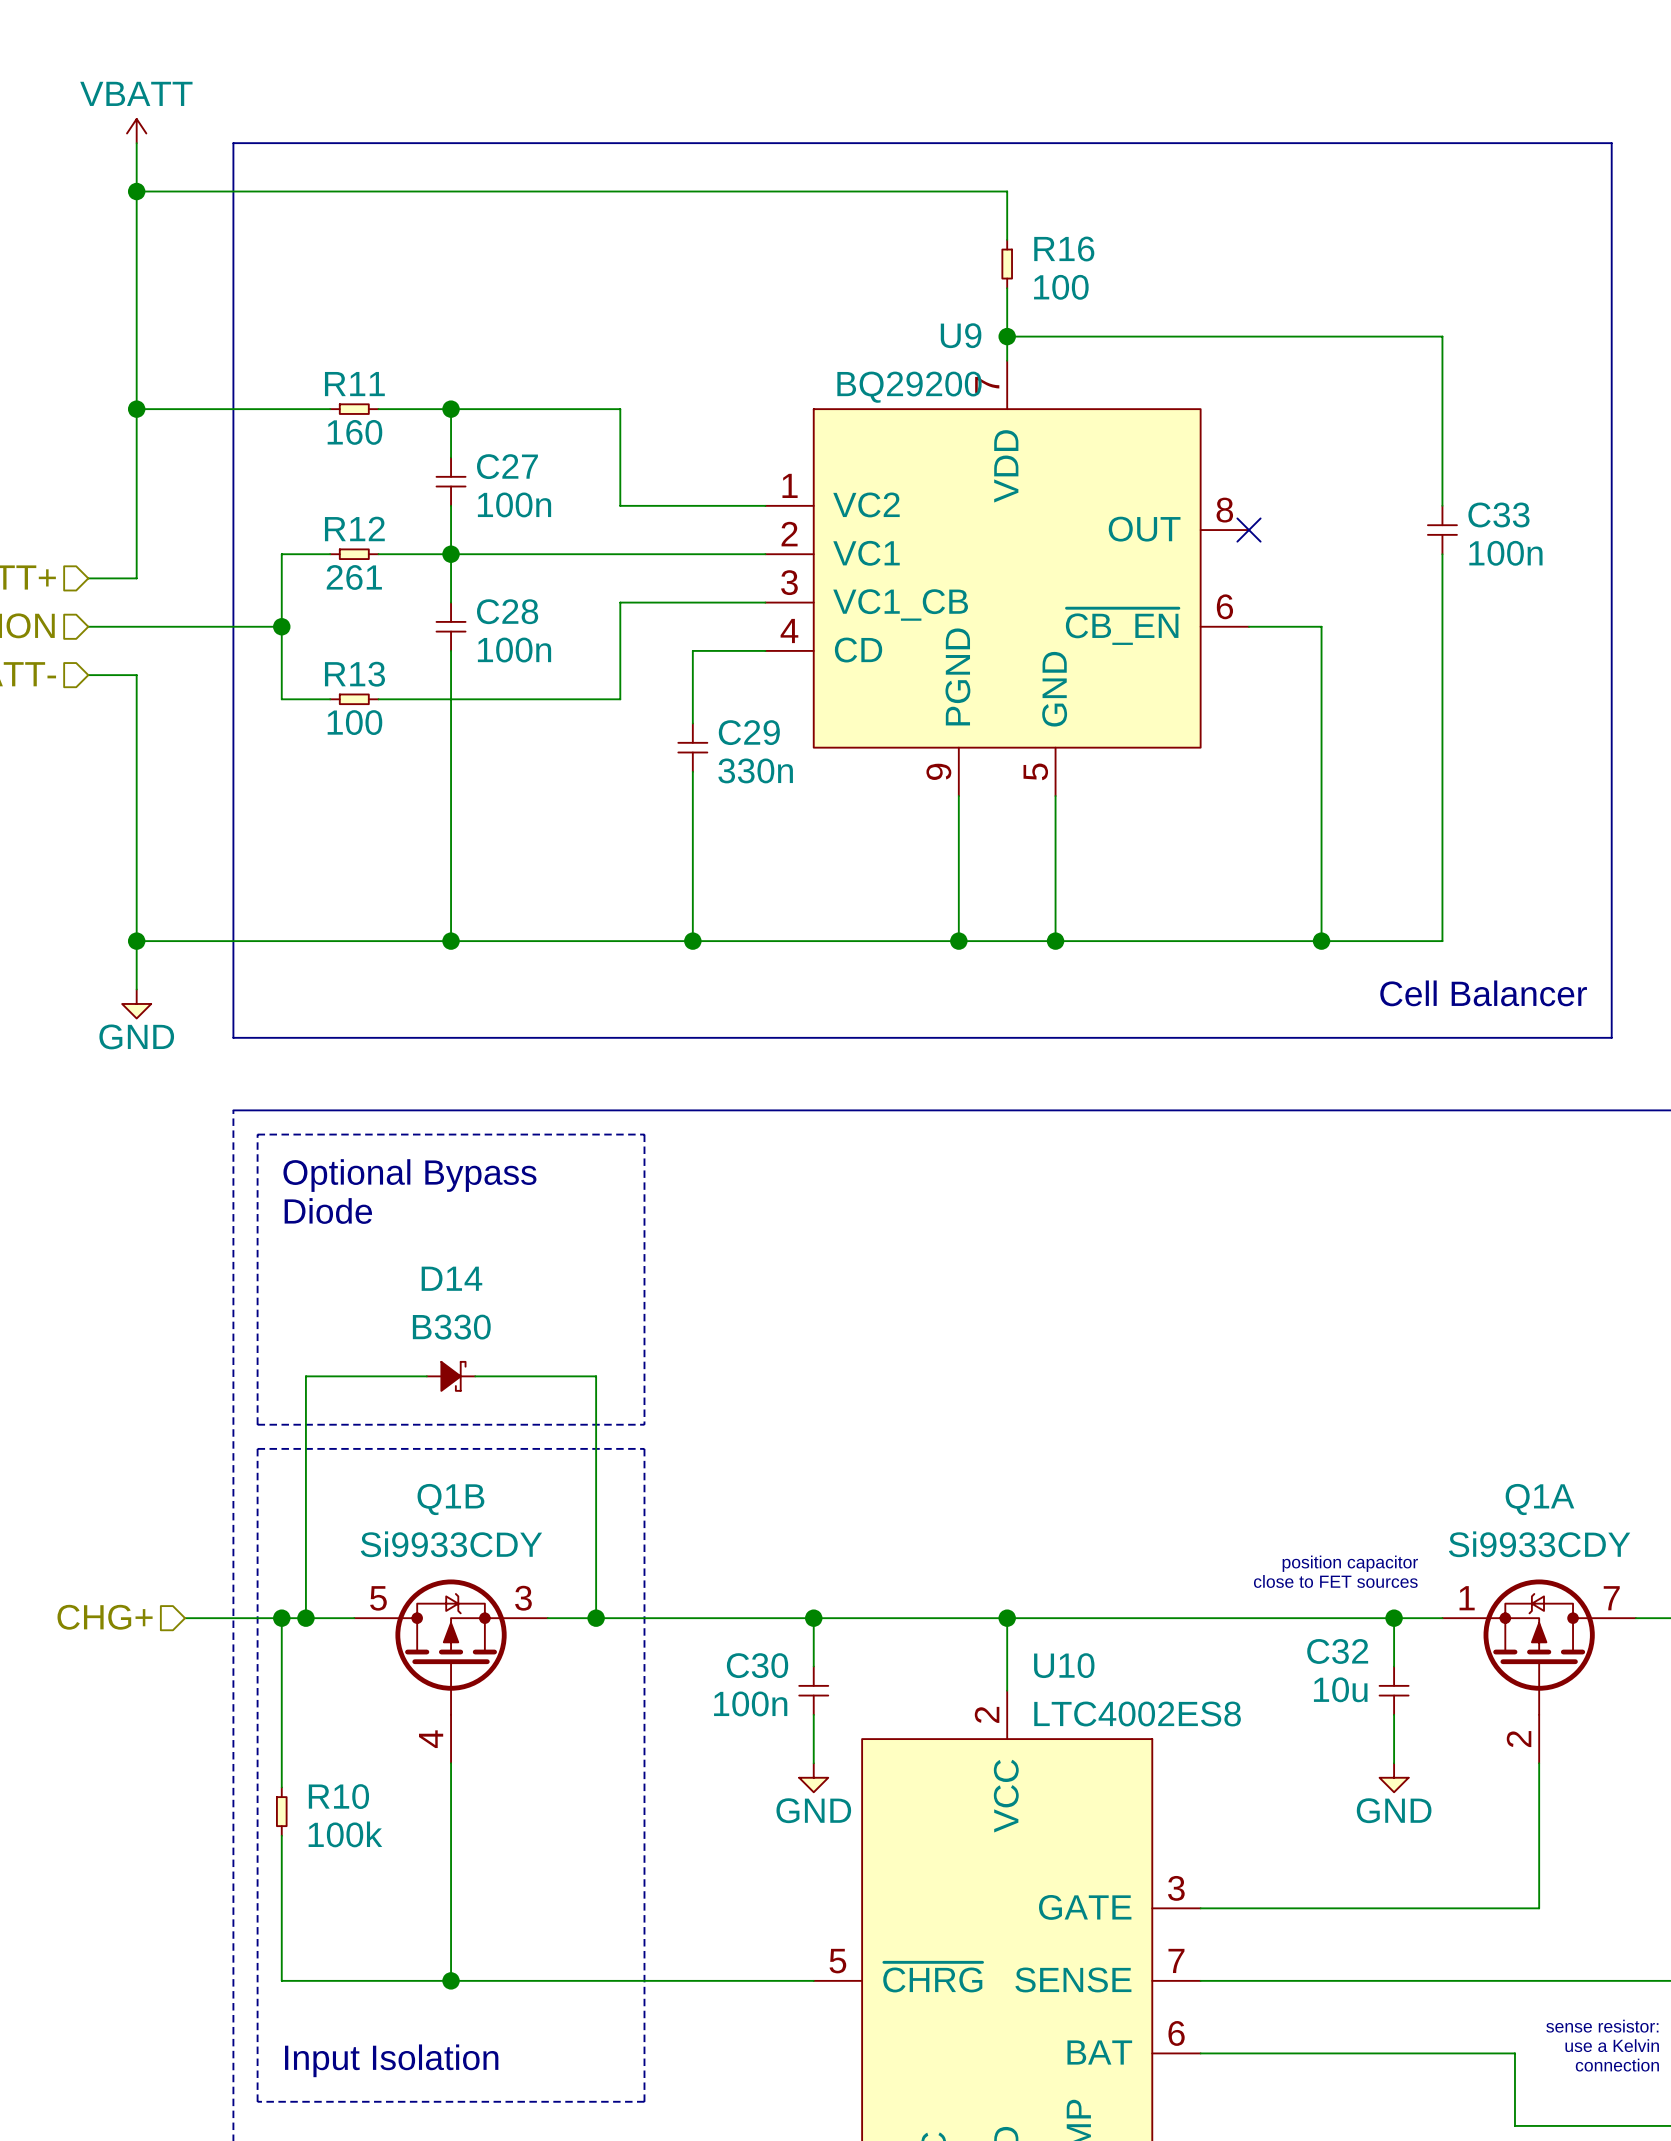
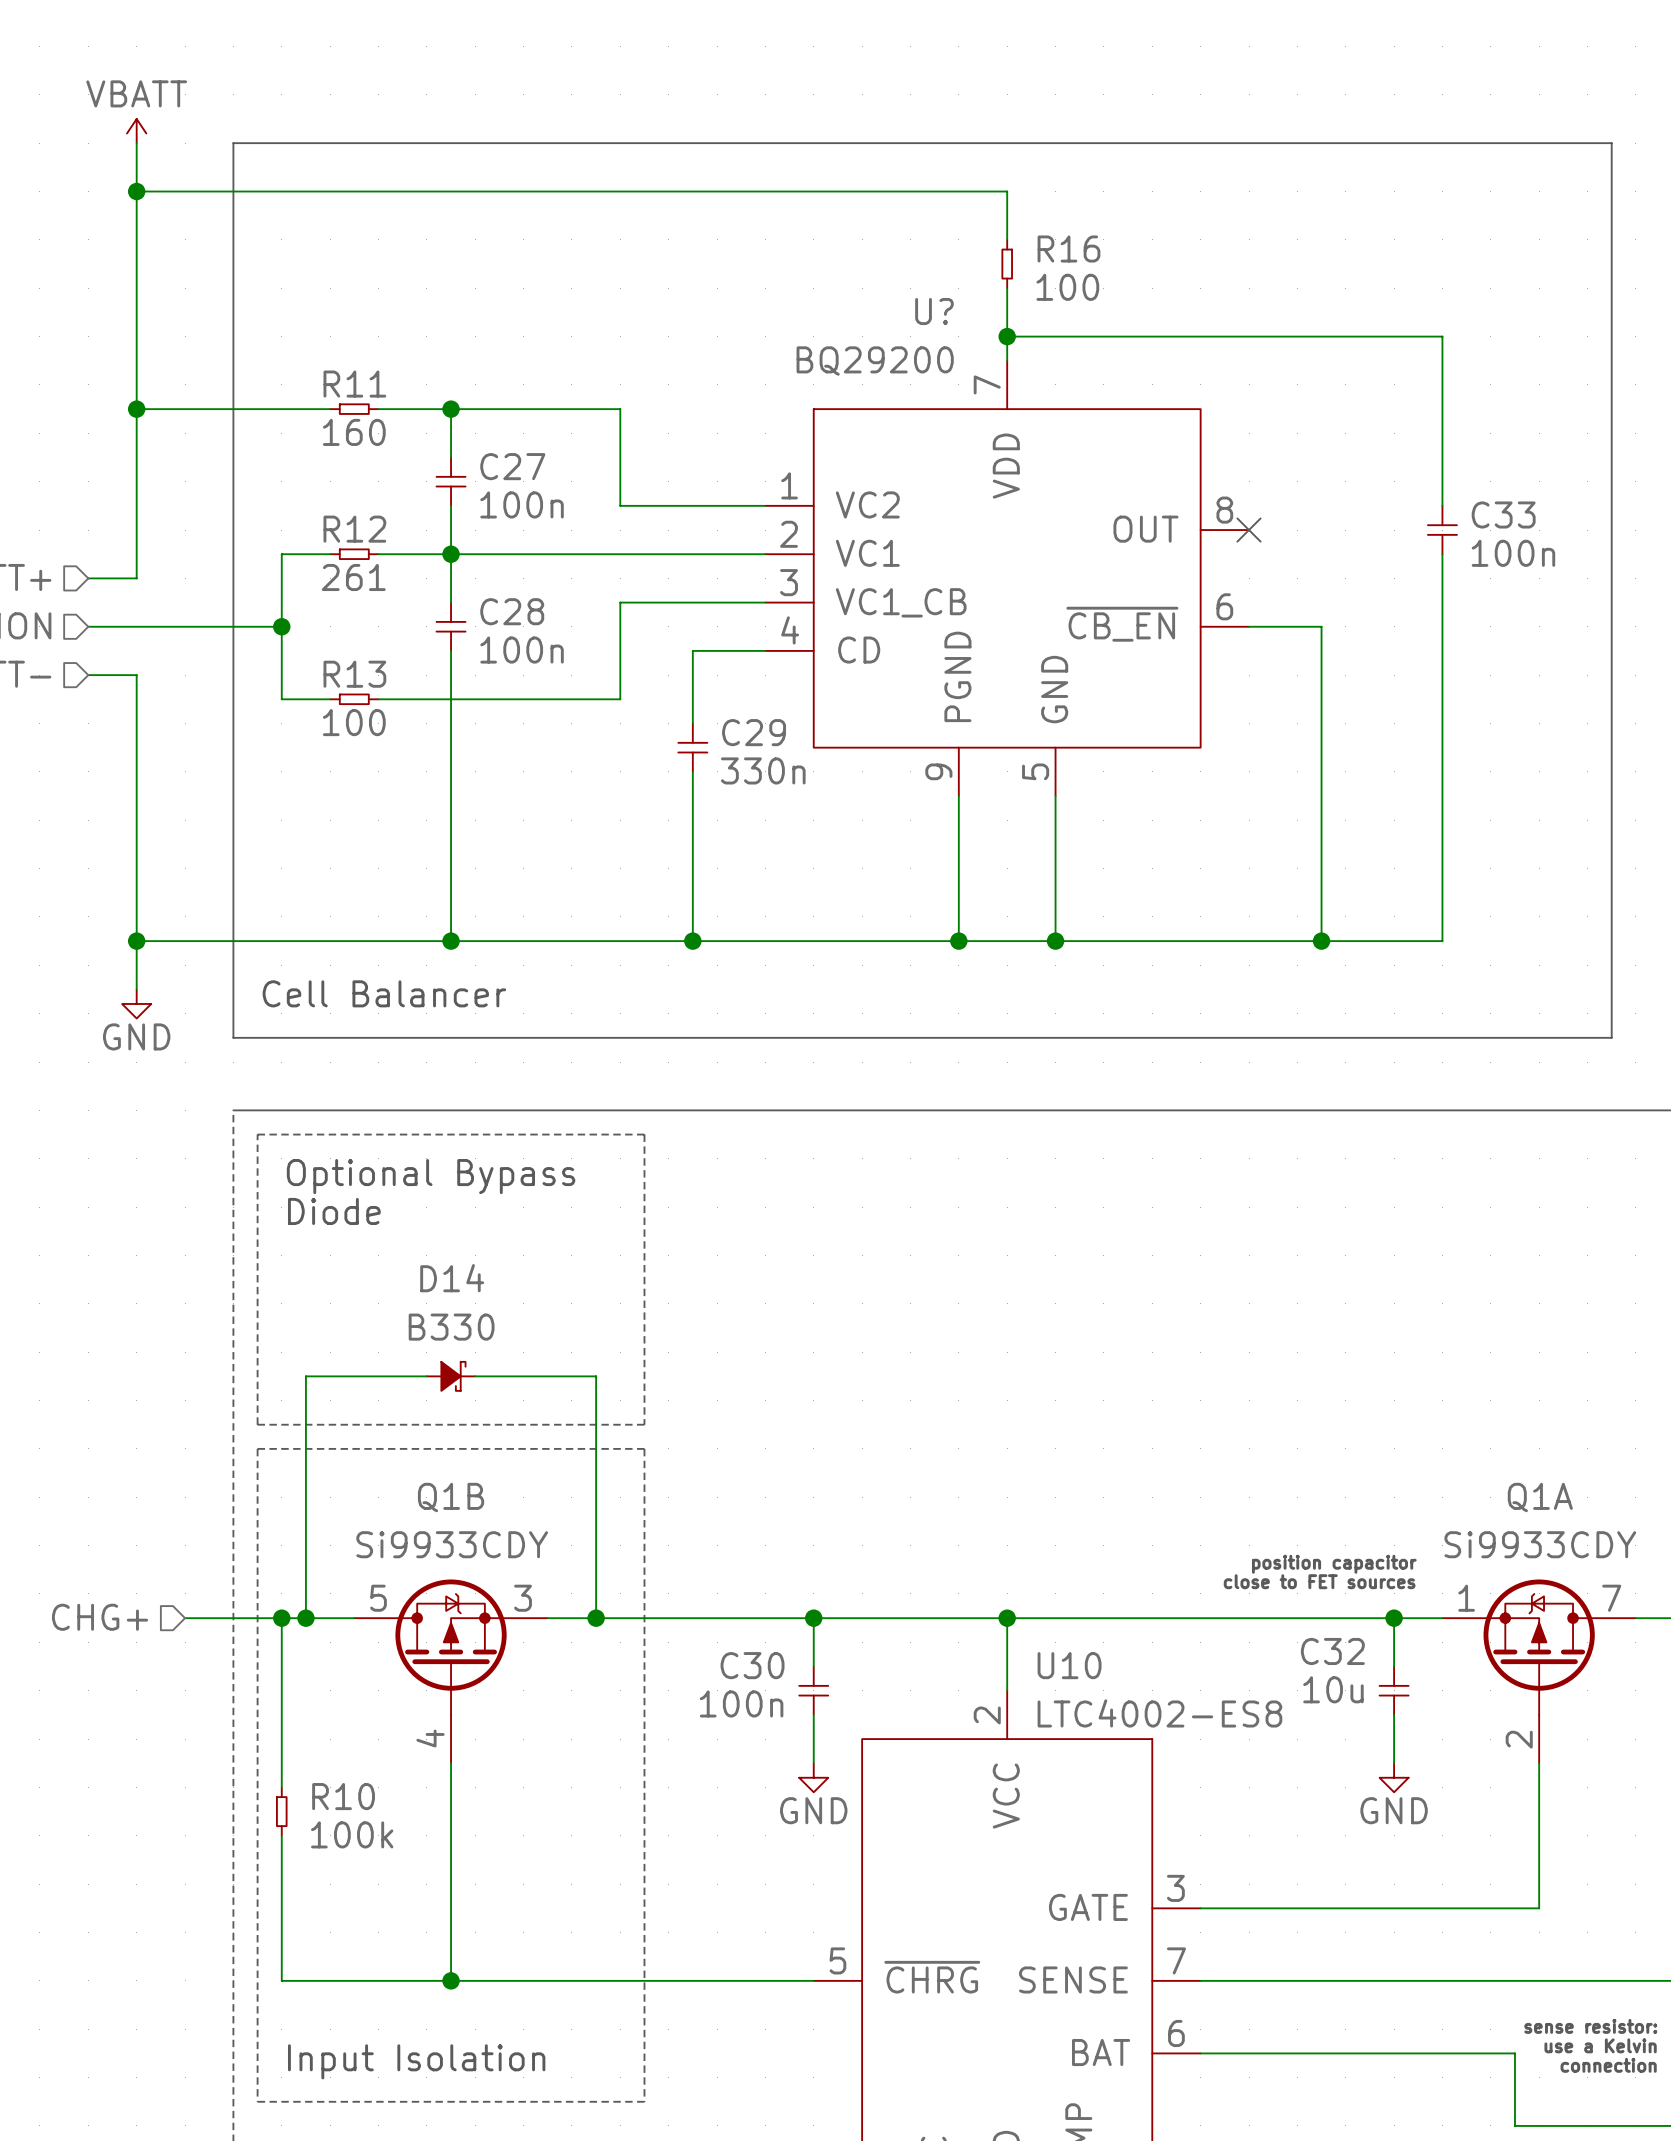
U9 name: U9 (961, 335) -> U? (934, 311)
U9 value position: BQ29200 (909, 387) -> BQ29200 (875, 361)
text: none -> Cell Balancer (384, 993)
text: Cell Balancer (1483, 993) -> none
U10 value: LTC4002ES8 (1137, 1713) -> LTC4002-ES8 (1159, 1713)

